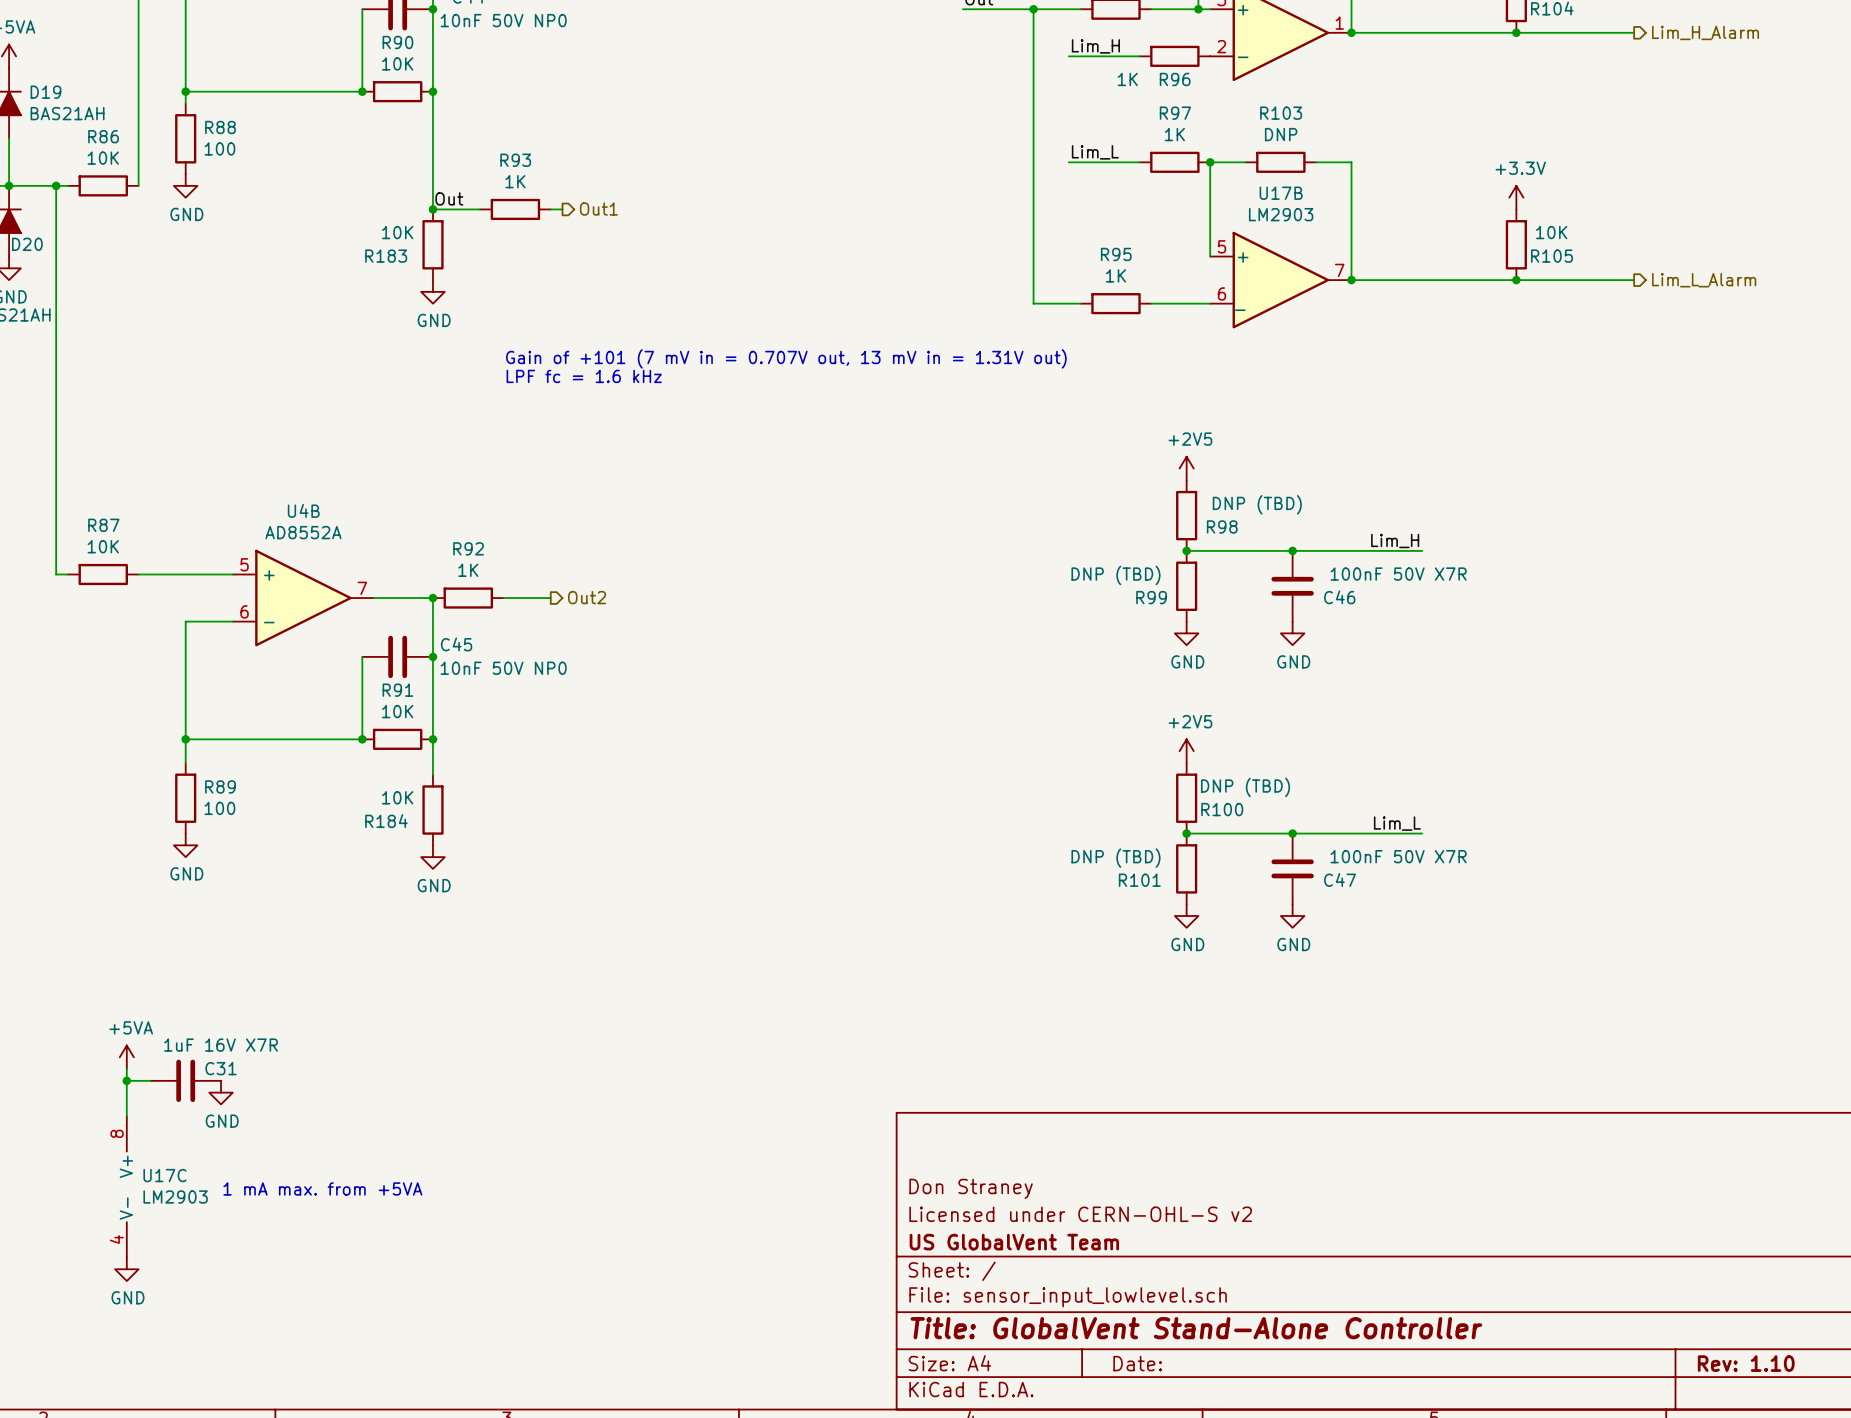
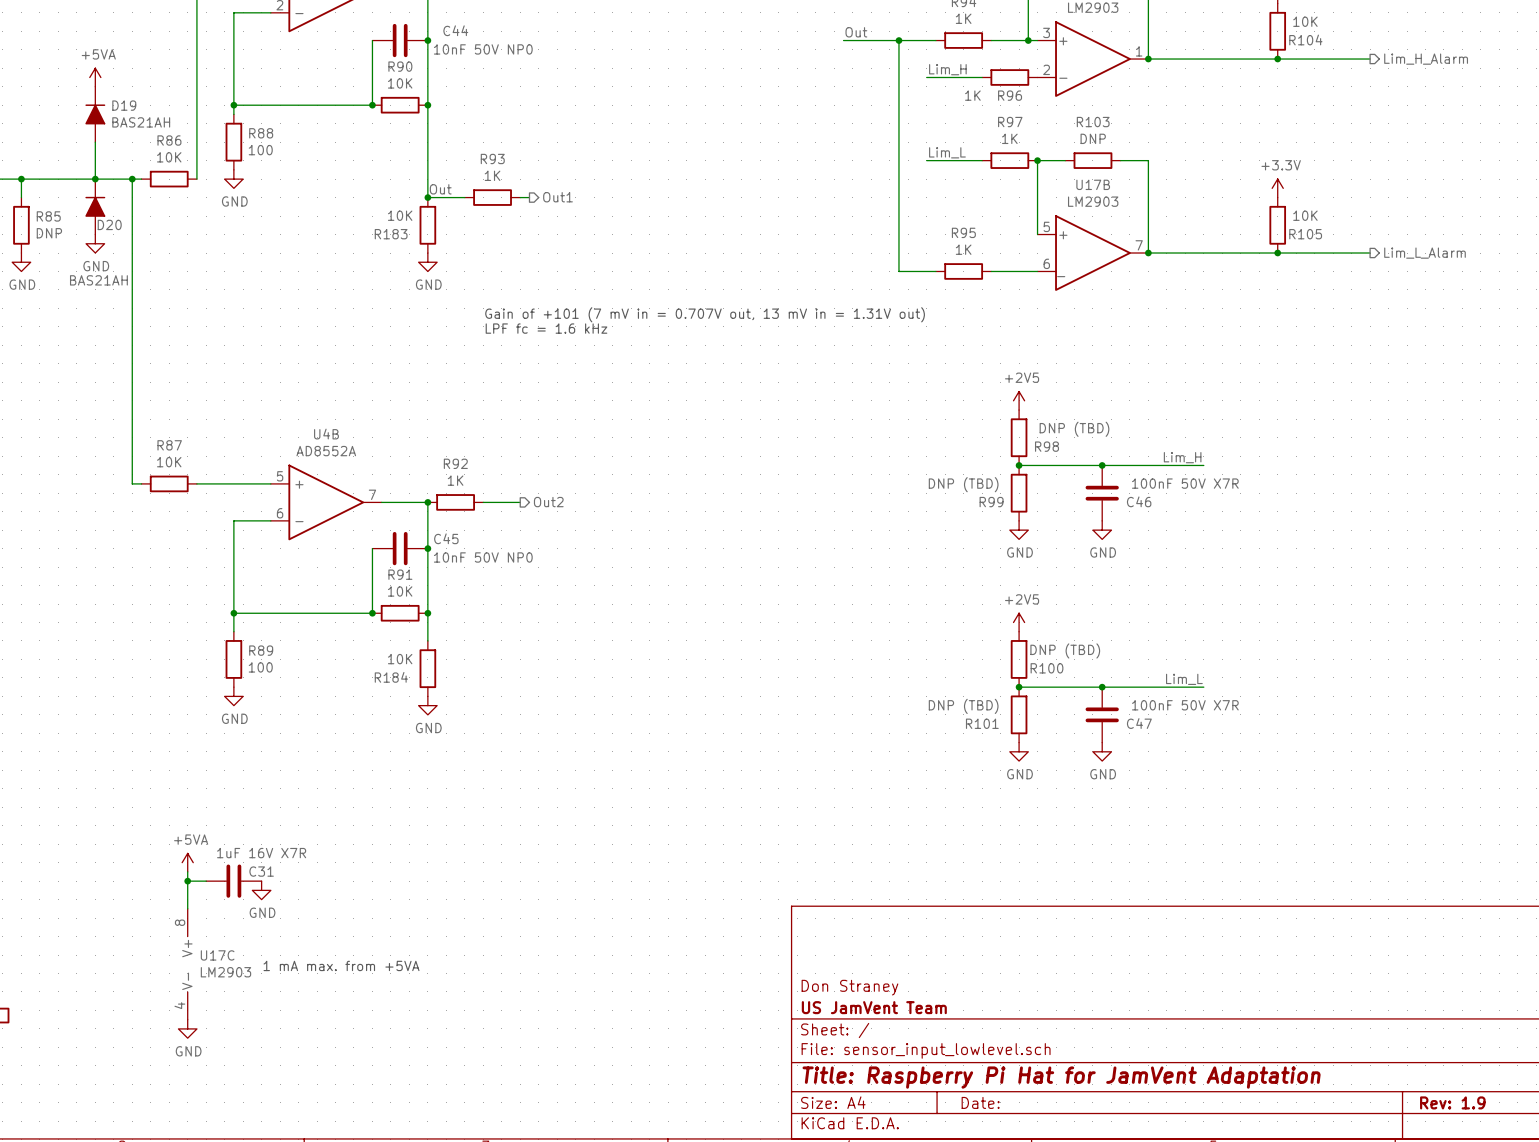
title block: Don Straney (971, 1188) -> none
title block: Licensed under CERN-OHL-S v2 (1080, 1214) -> Don Straney (849, 987)
title block: US GlobalVent Team (1014, 1242) -> US JamVent Team (874, 1007)
title block: Title: GlobalVent Stand-Alone Controller (1196, 1328) -> Title: Raspberry Pi Hat for JamVent Adaptation (1061, 1077)
title block: Rev: 1.10 (1746, 1363) -> Rev: 1.9 (1452, 1102)

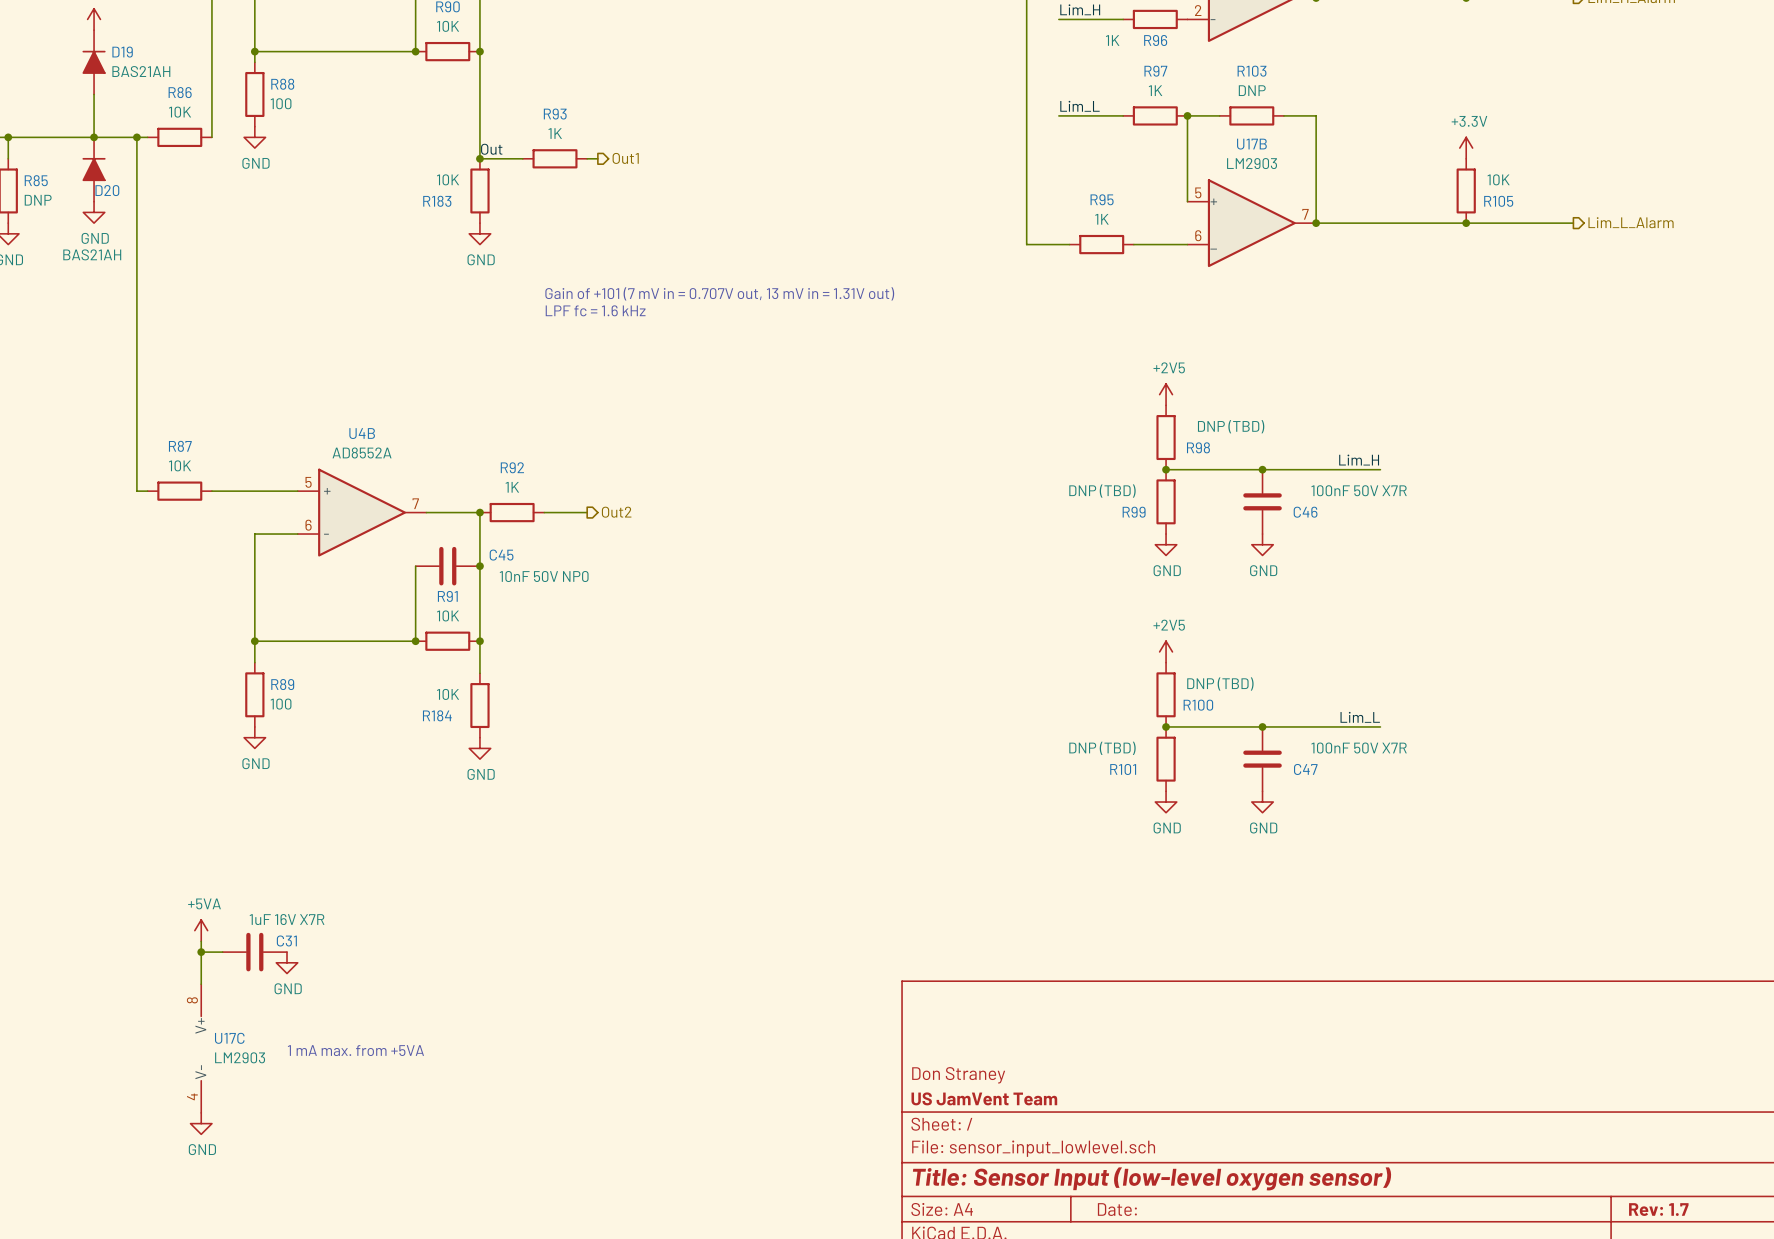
title block: Title: Raspberry Pi Hat for JamVent Adaptation (1061, 1077) -> Title: Sensor Input (low-level oxygen sensor) (1152, 1178)
title block: Rev: 1.9 (1452, 1102) -> Rev: 1.7 (1658, 1209)

